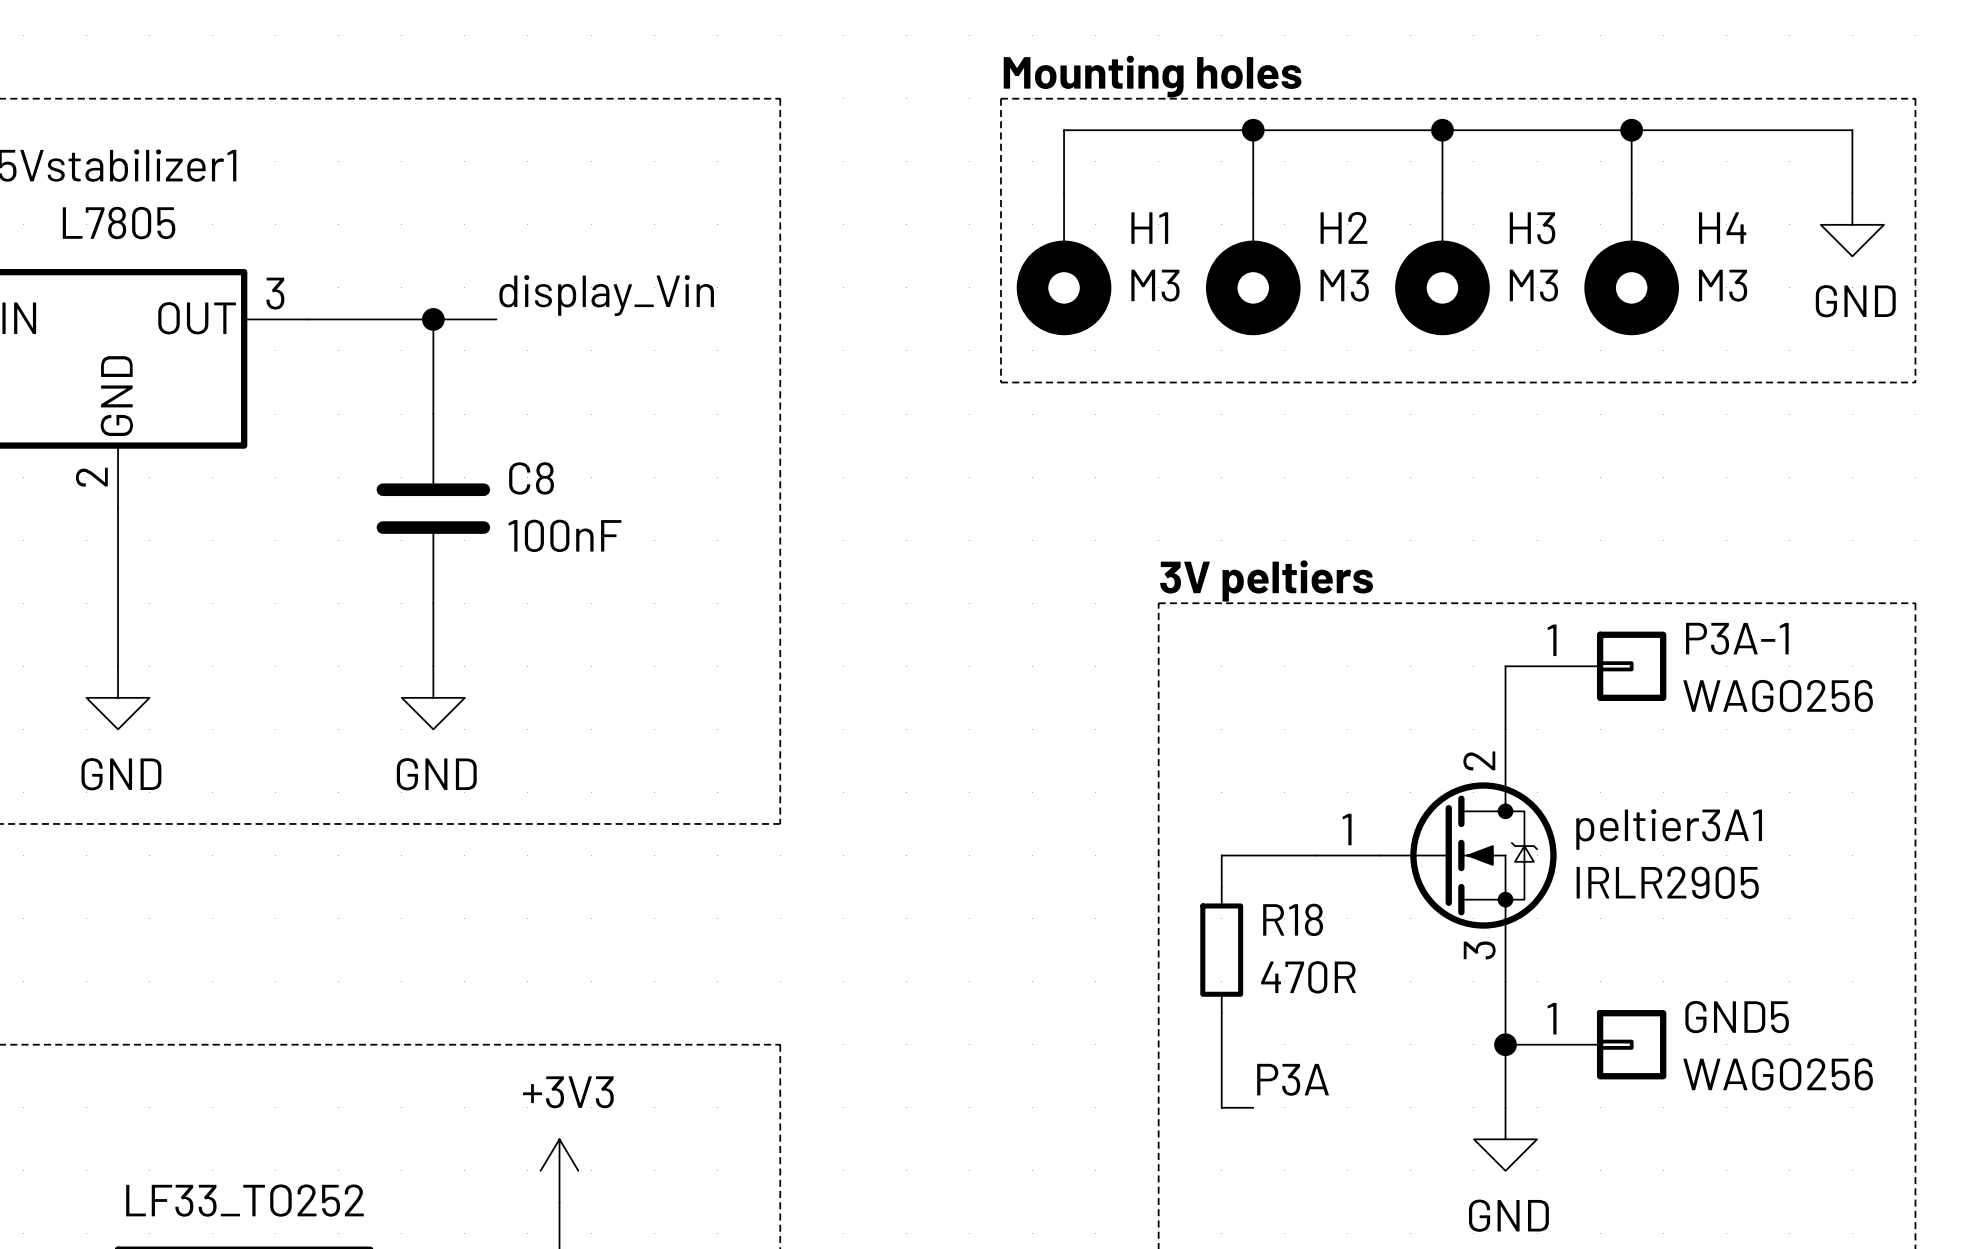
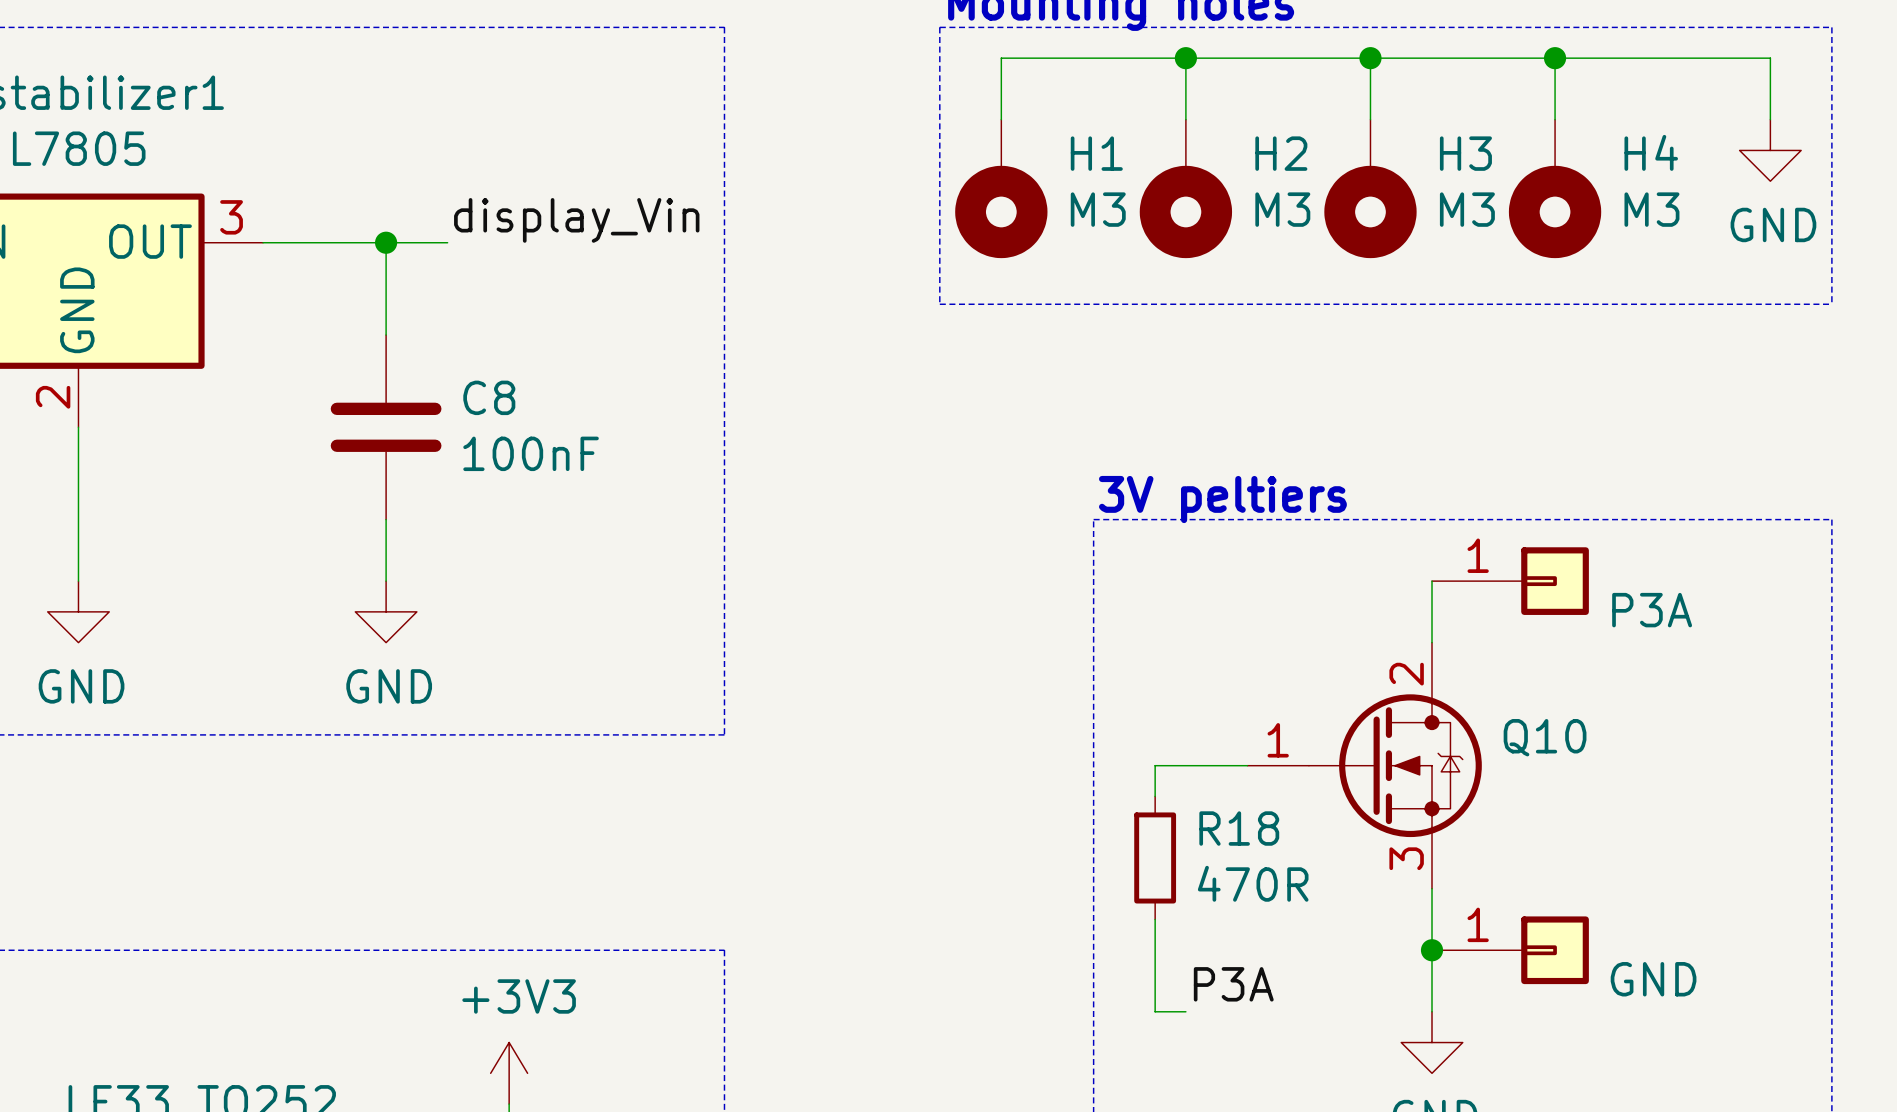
P3A-1 name: P3A-1 (1737, 638) -> none
P3A-1 value: WAGO256 (1778, 696) -> P3A (1652, 610)
peltier3A1 name: peltier3A1 (1669, 829) -> Q10 (1545, 737)
peltier3A1 value: IRLR2905 (1667, 882) -> none
GND5 name: GND5 (1737, 1017) -> none
GND5 value: WAGO256 (1778, 1074) -> GND (1653, 979)

